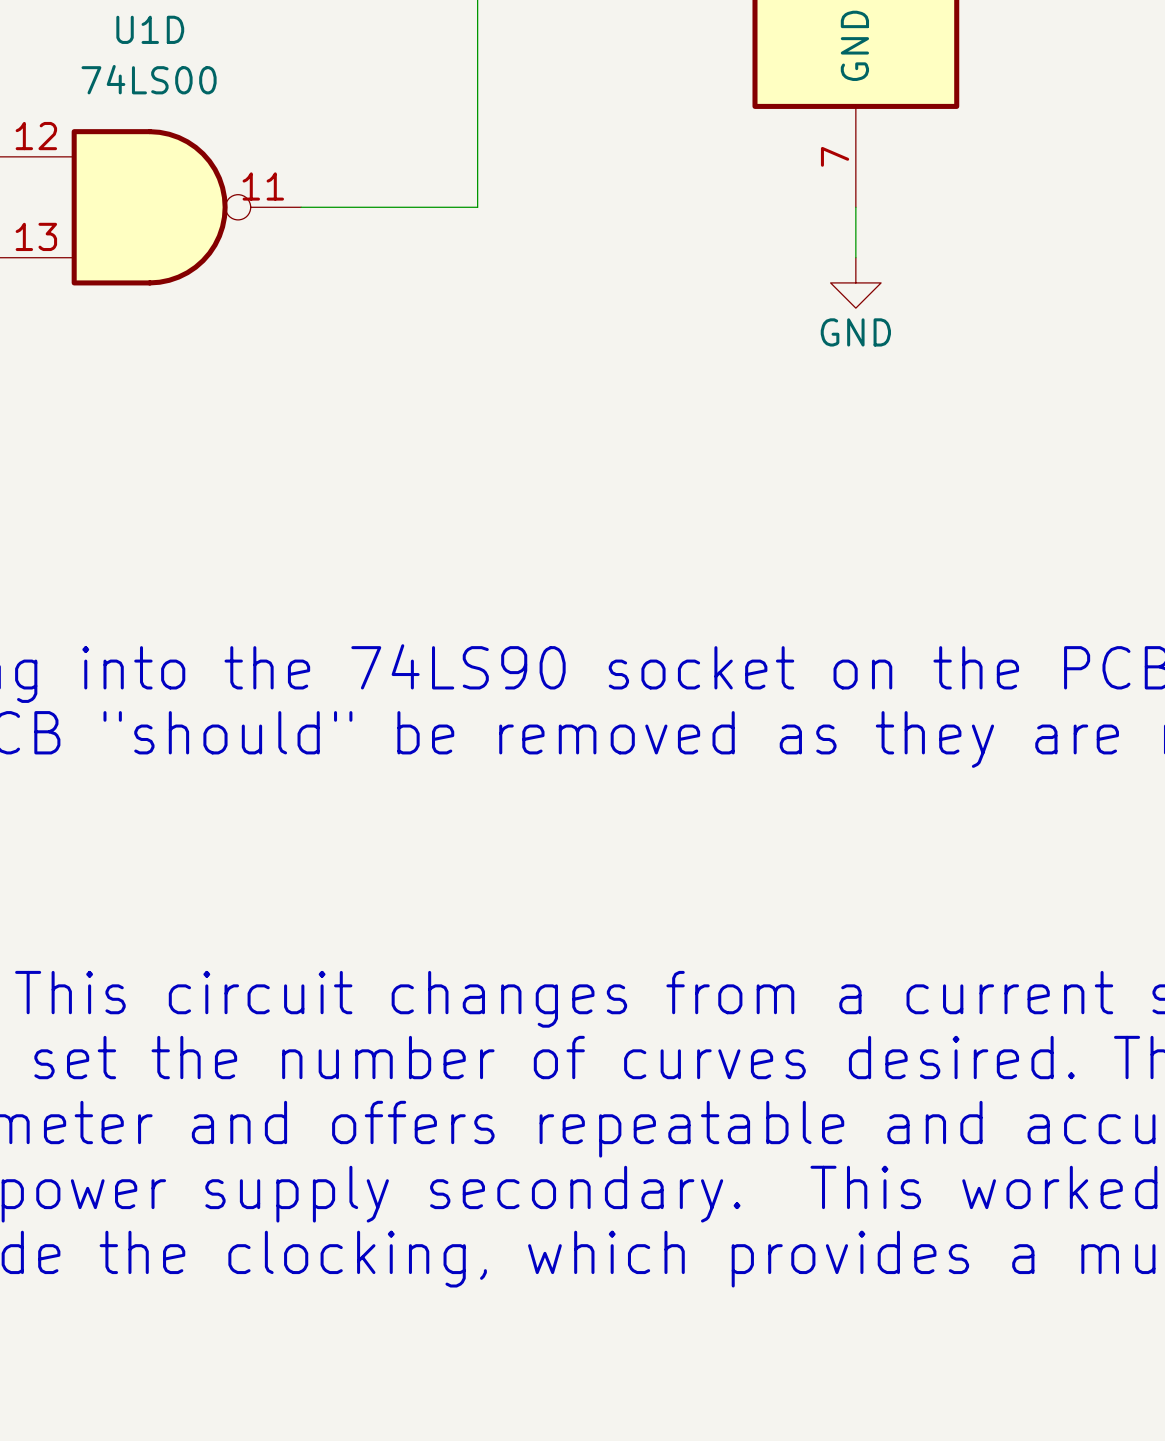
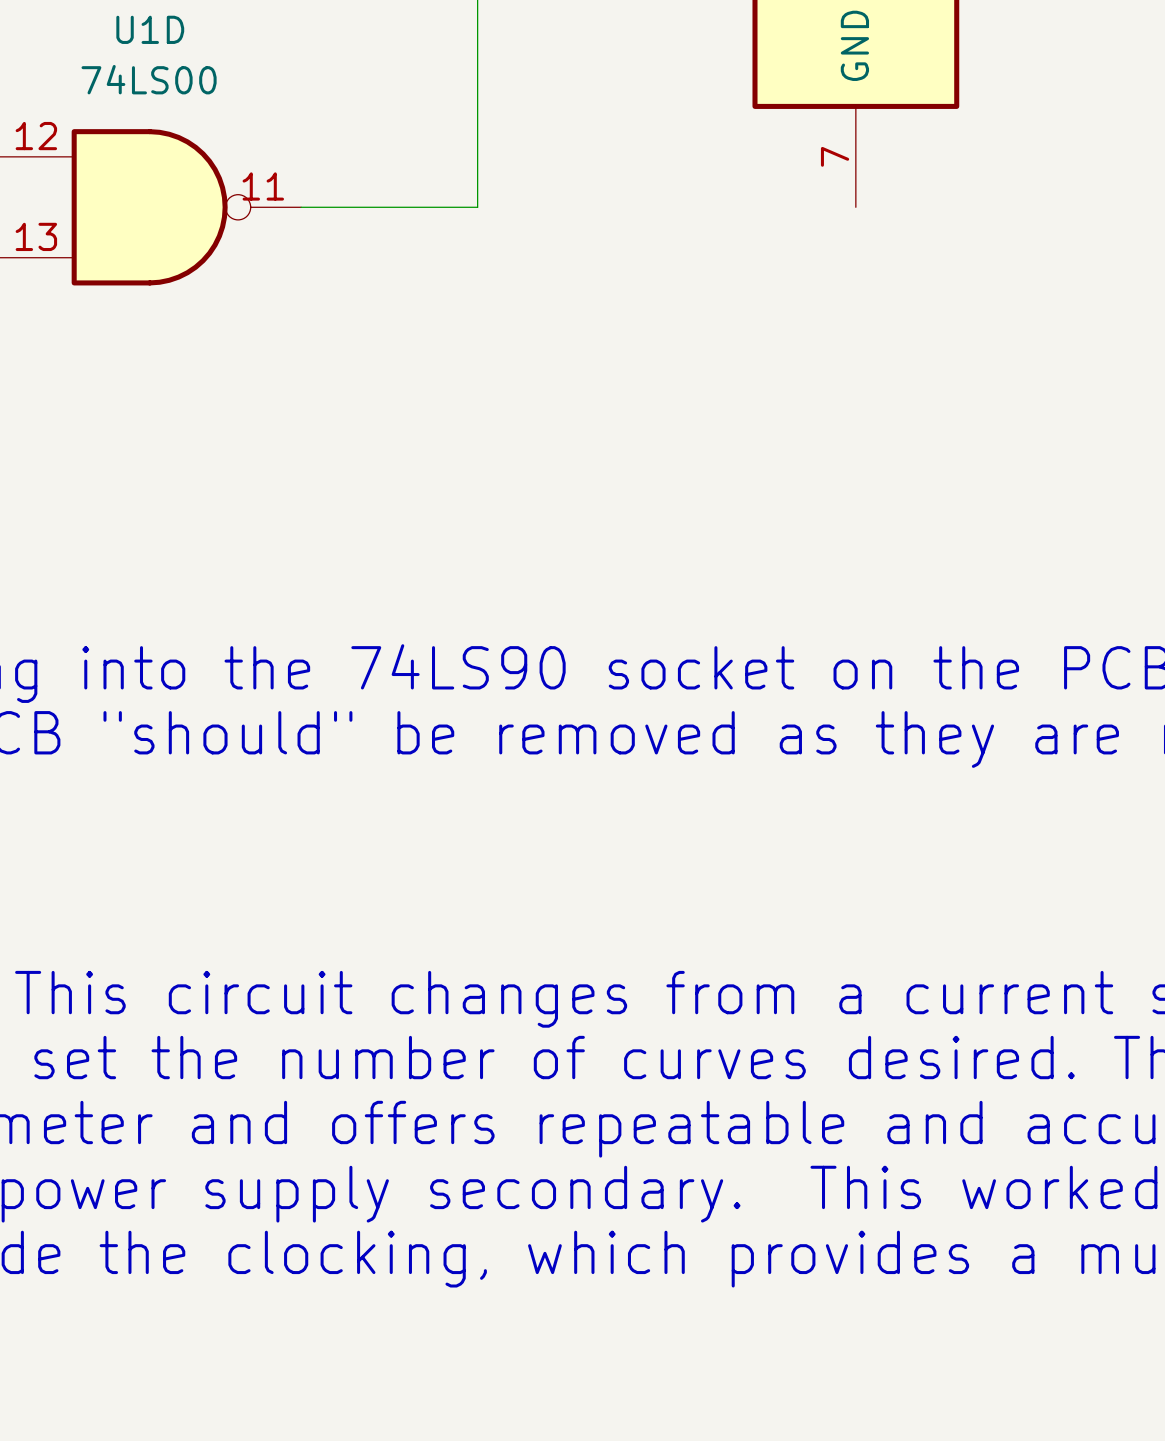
wire: (855, 207) (855, 257) -> none
power symbol: GND (855, 282) -> none

